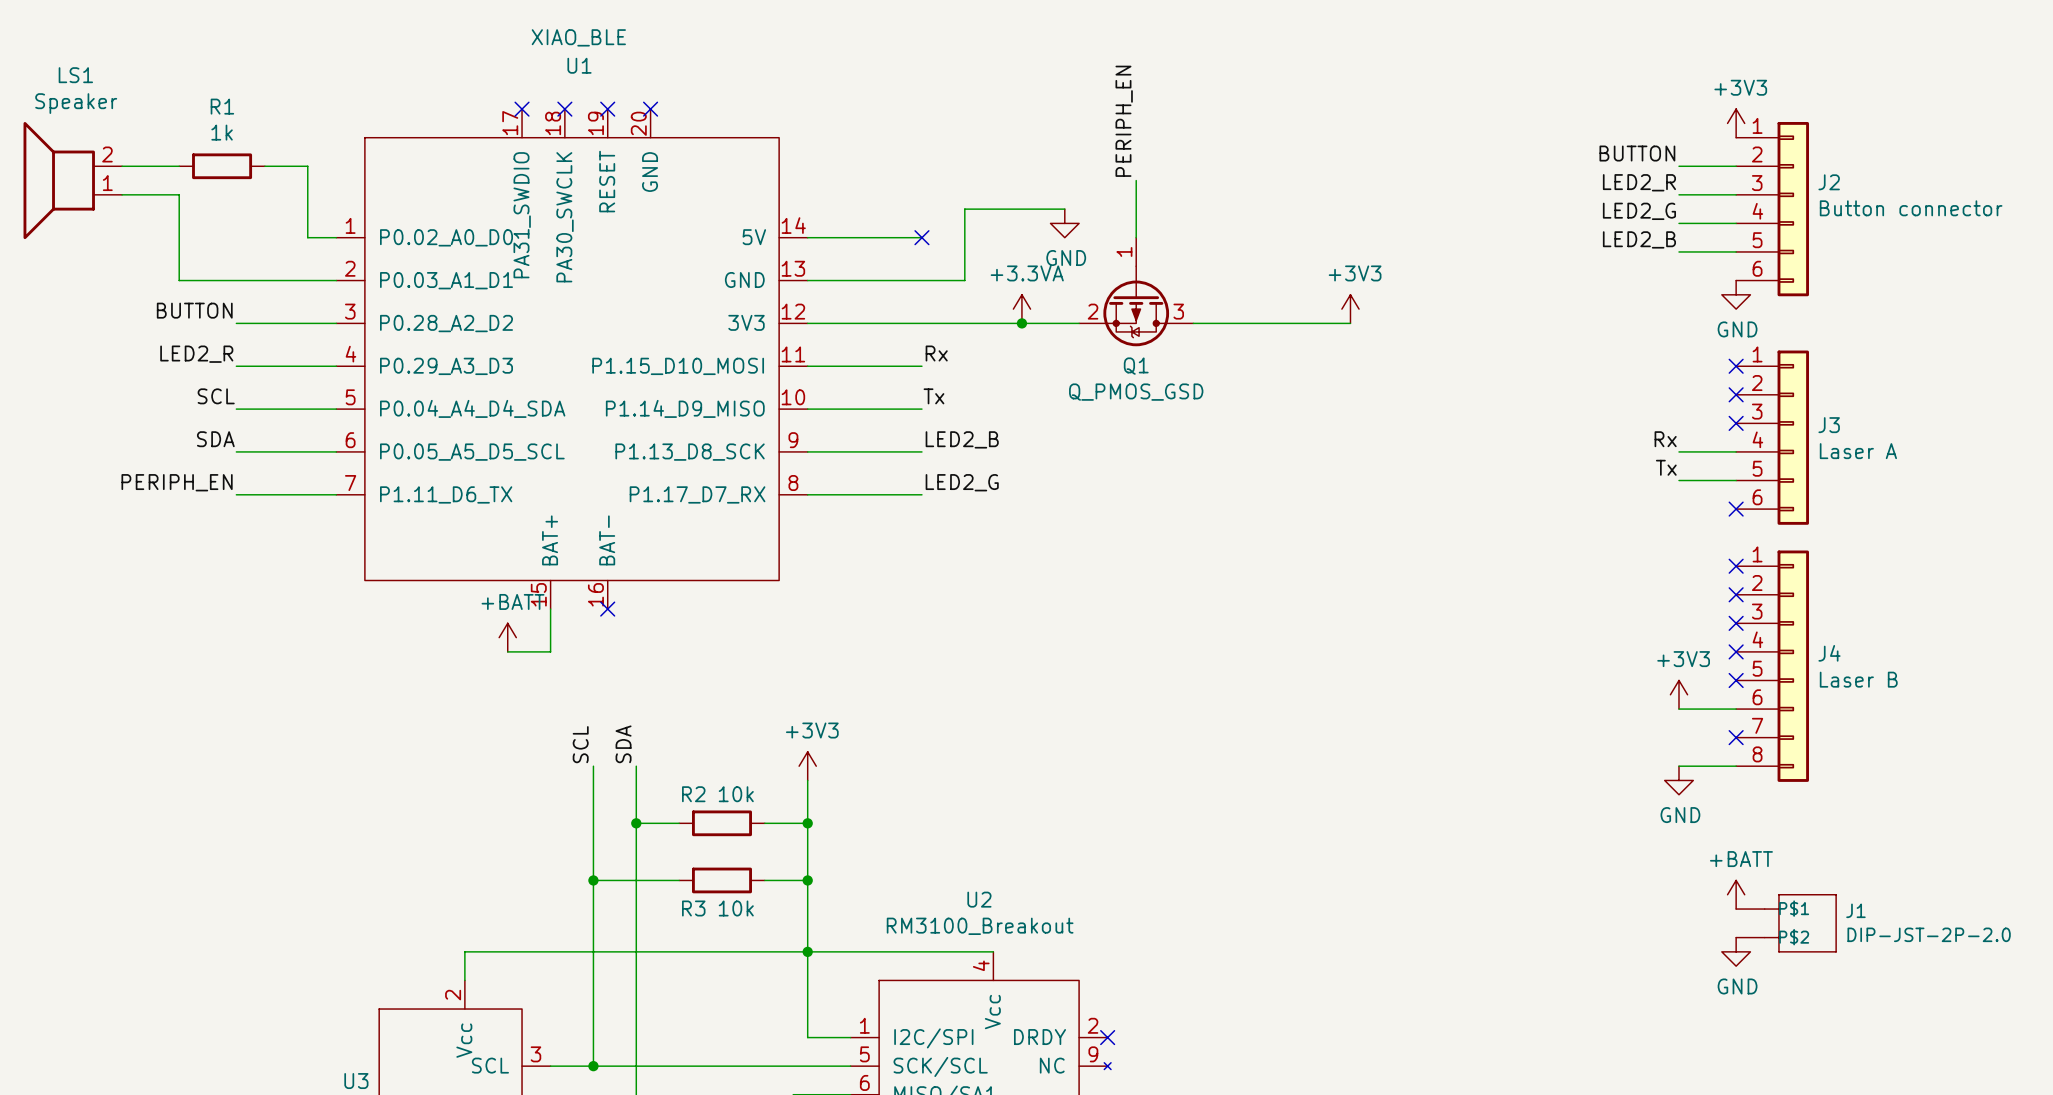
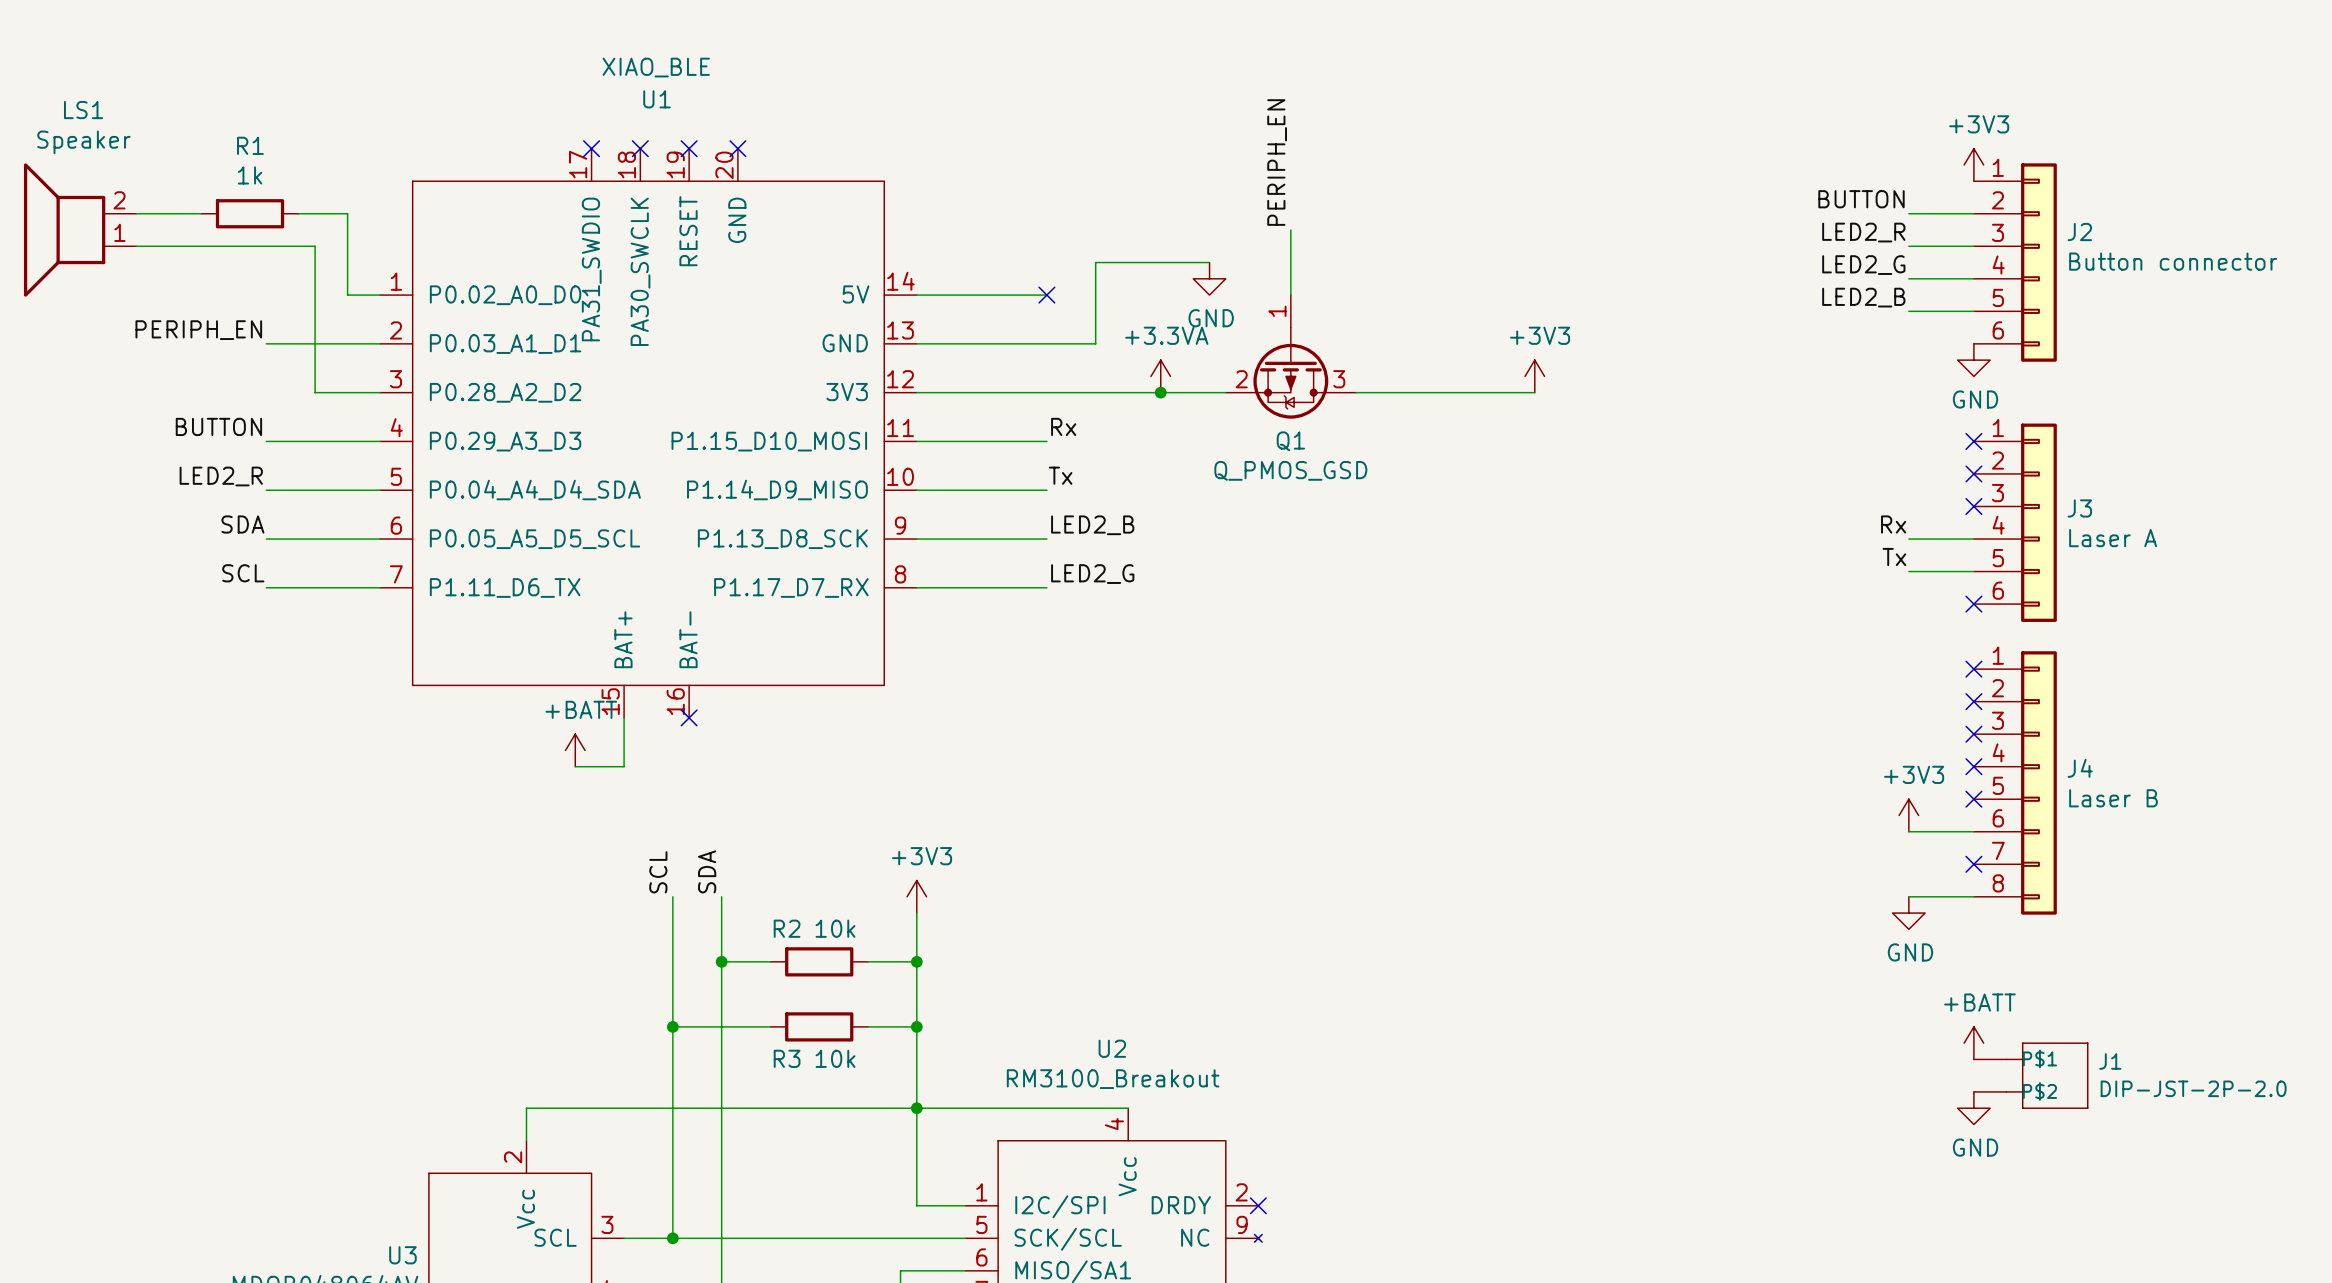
wire: (179, 194) (179, 280) (236, 280) -> (201, 246) (315, 246) (315, 392)
label: none -> PERIPH_EN (198, 330)
label: BUTTON (194, 310) -> none
wire: (236, 323) (279, 323) -> none
label: LED2_R (196, 354) -> BUTTON (218, 426)
label: SCL (216, 396) -> LED2_R (221, 476)
label: PERIPH_EN (177, 482) -> SCL (243, 573)

